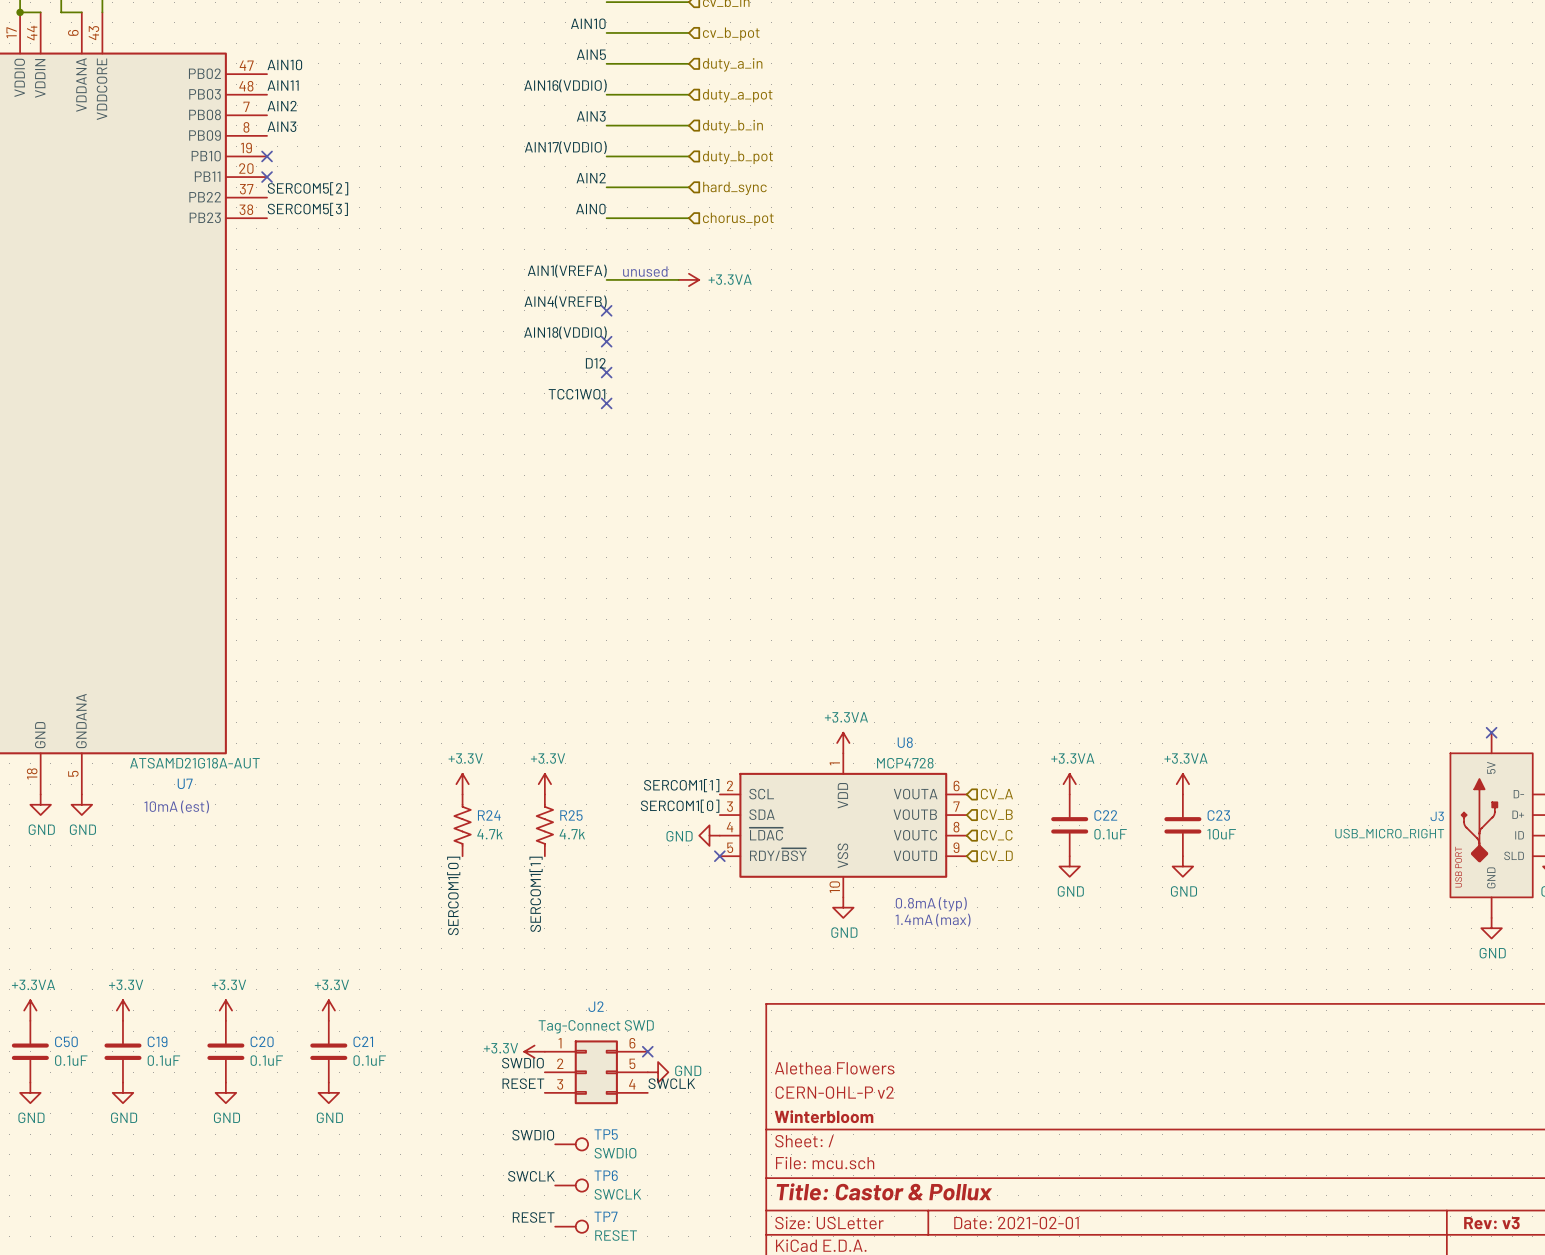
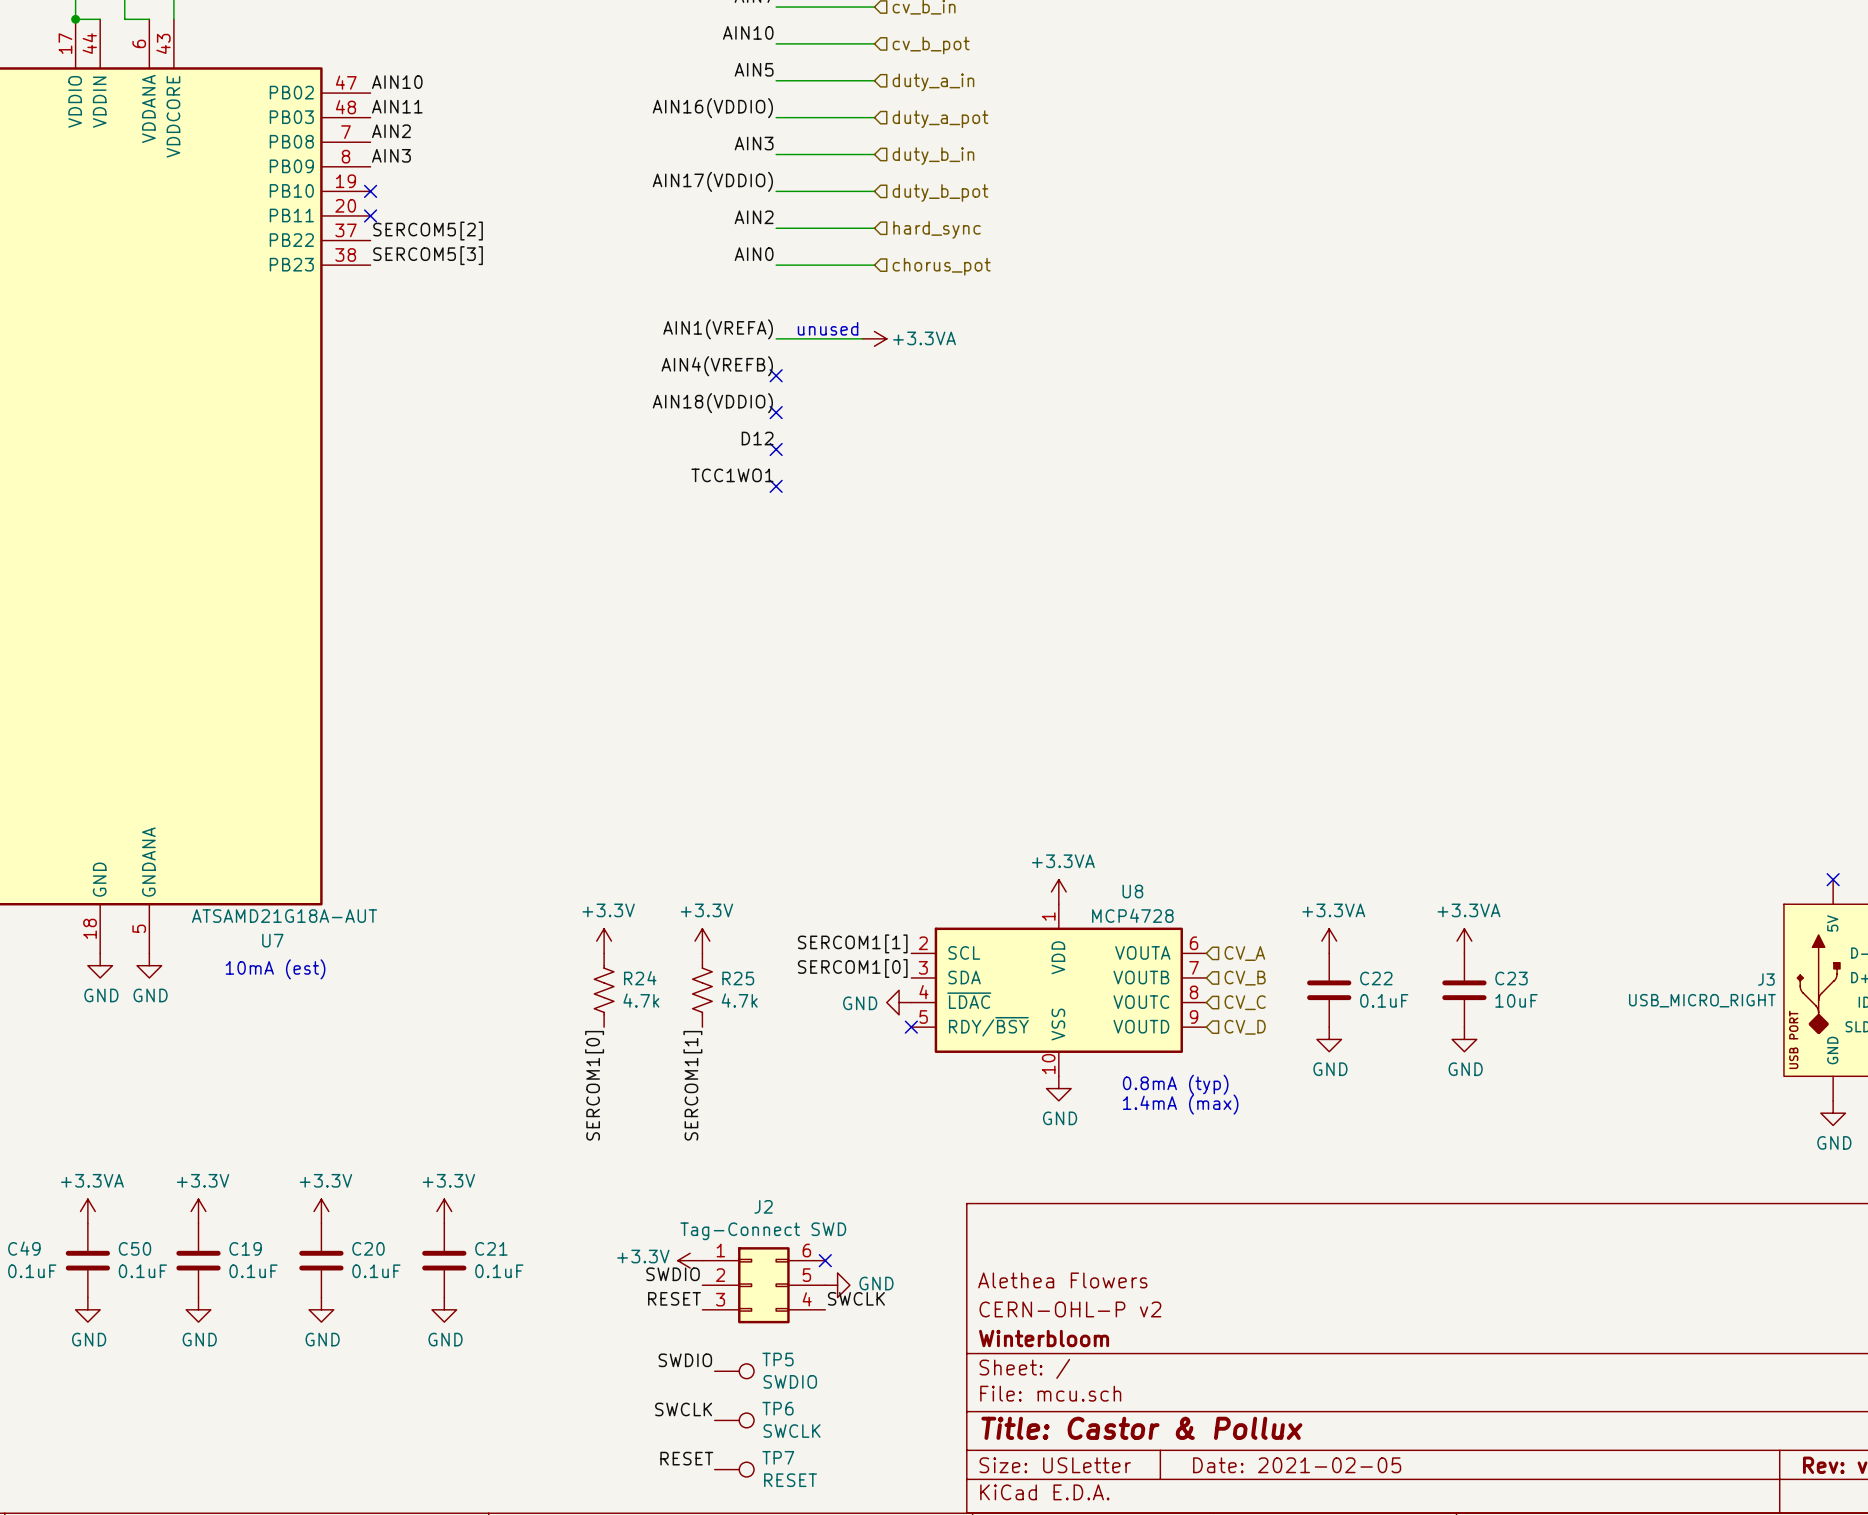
title block: Date: 2021-02-01 (1016, 1223) -> Date: 2021-02-05 (1297, 1465)

